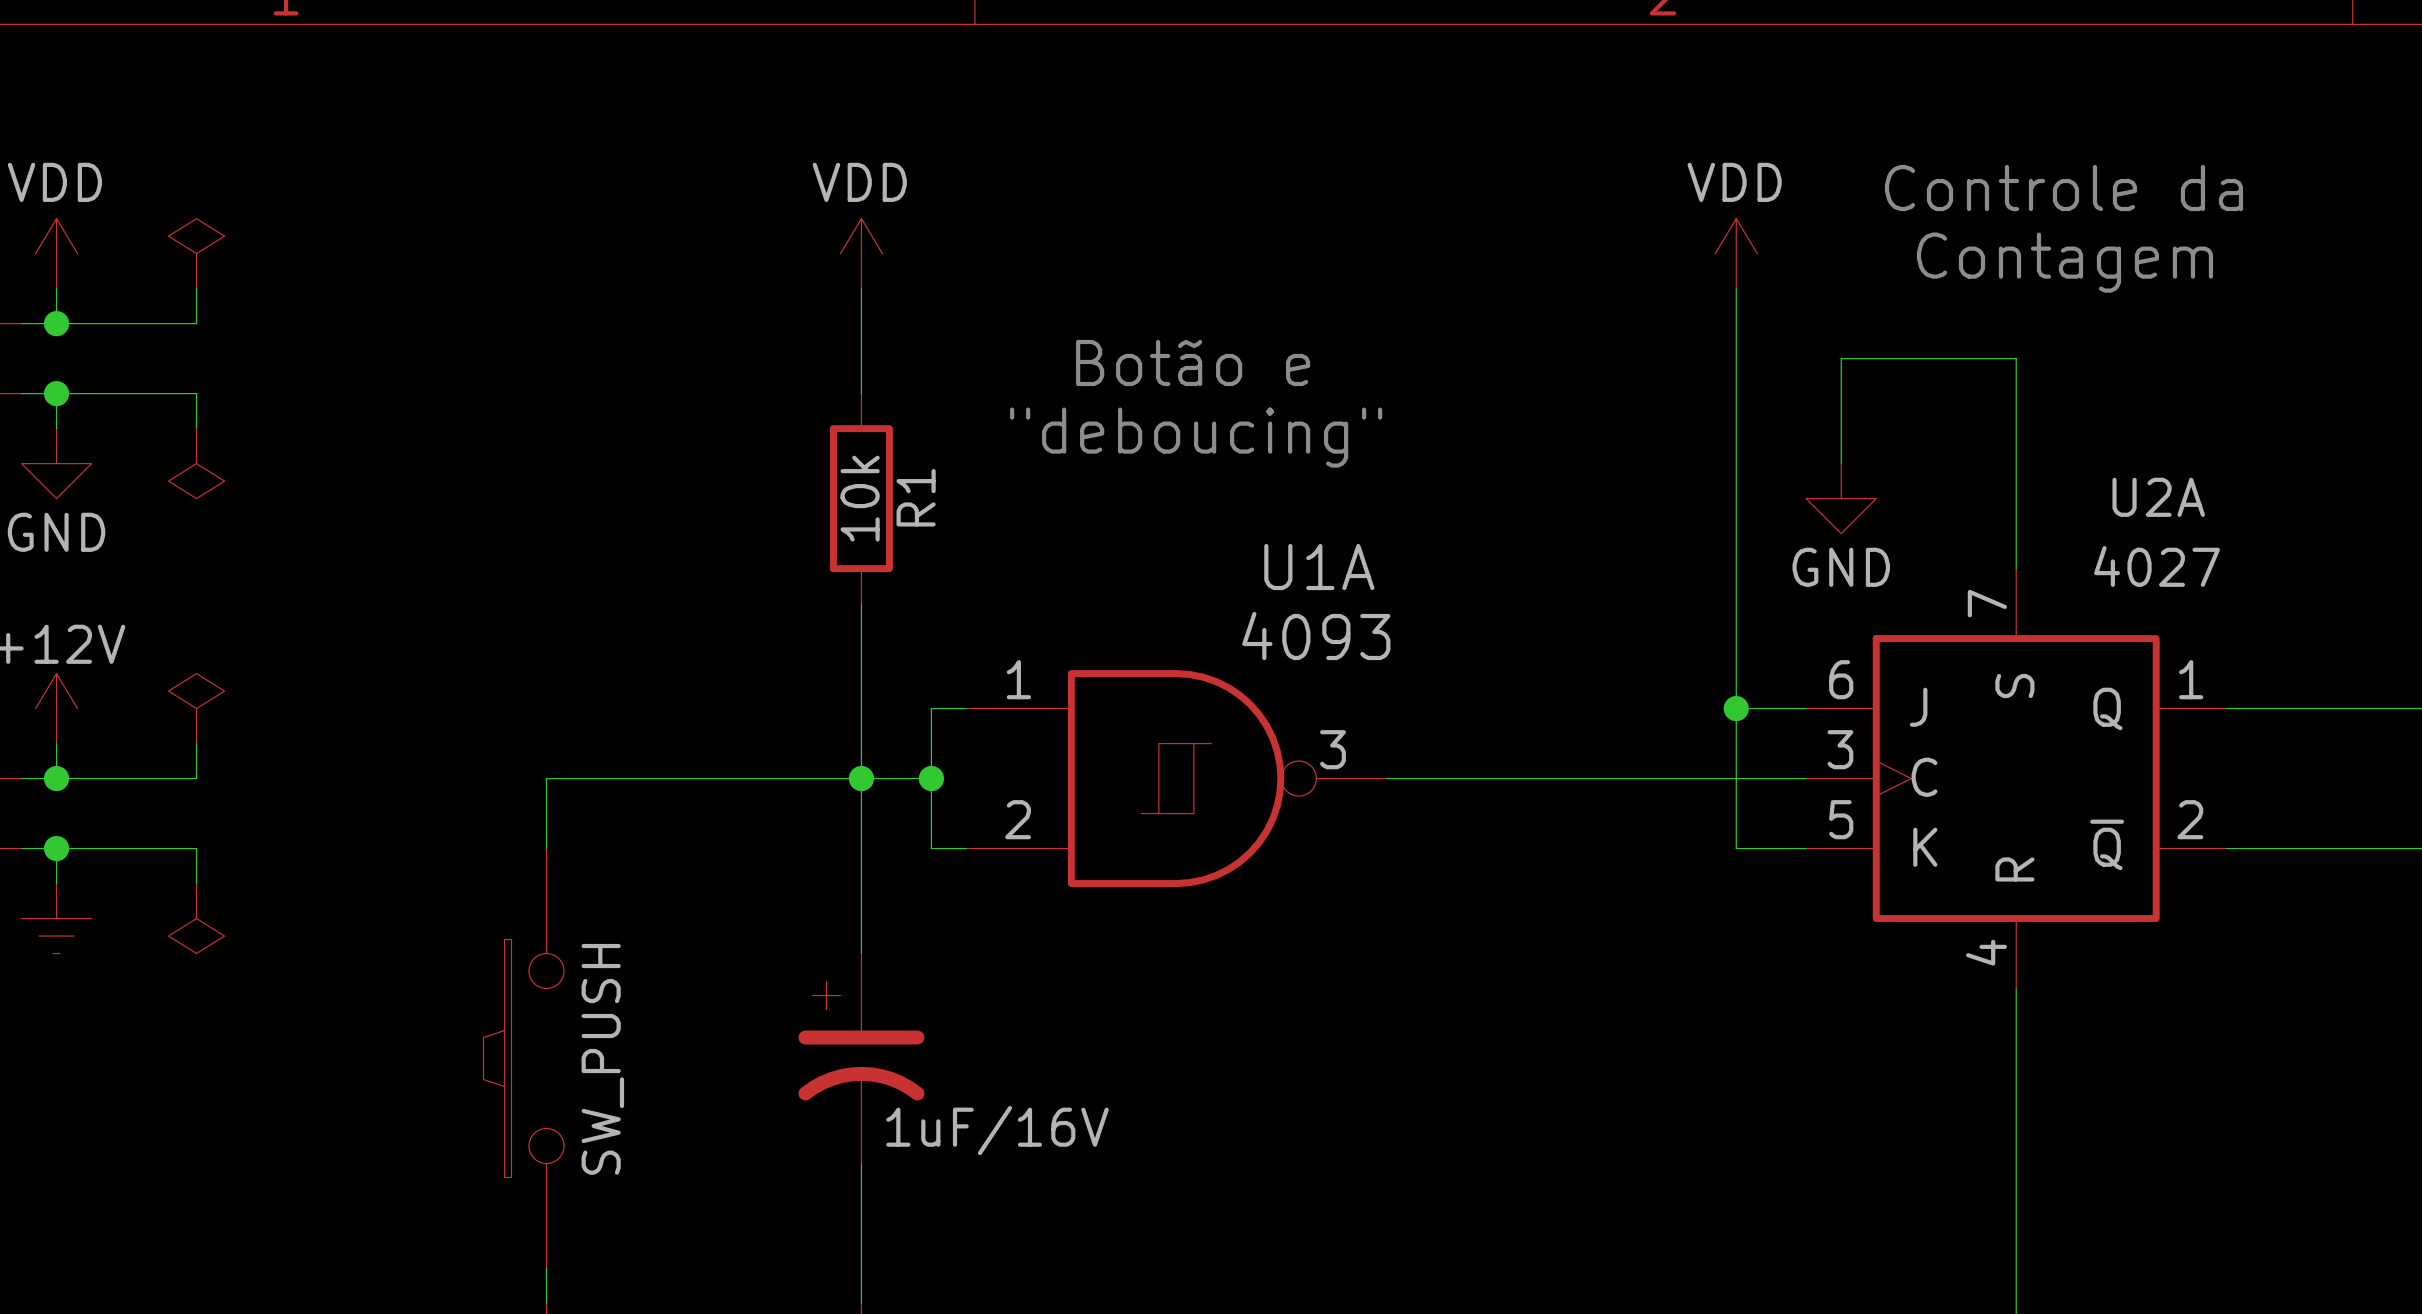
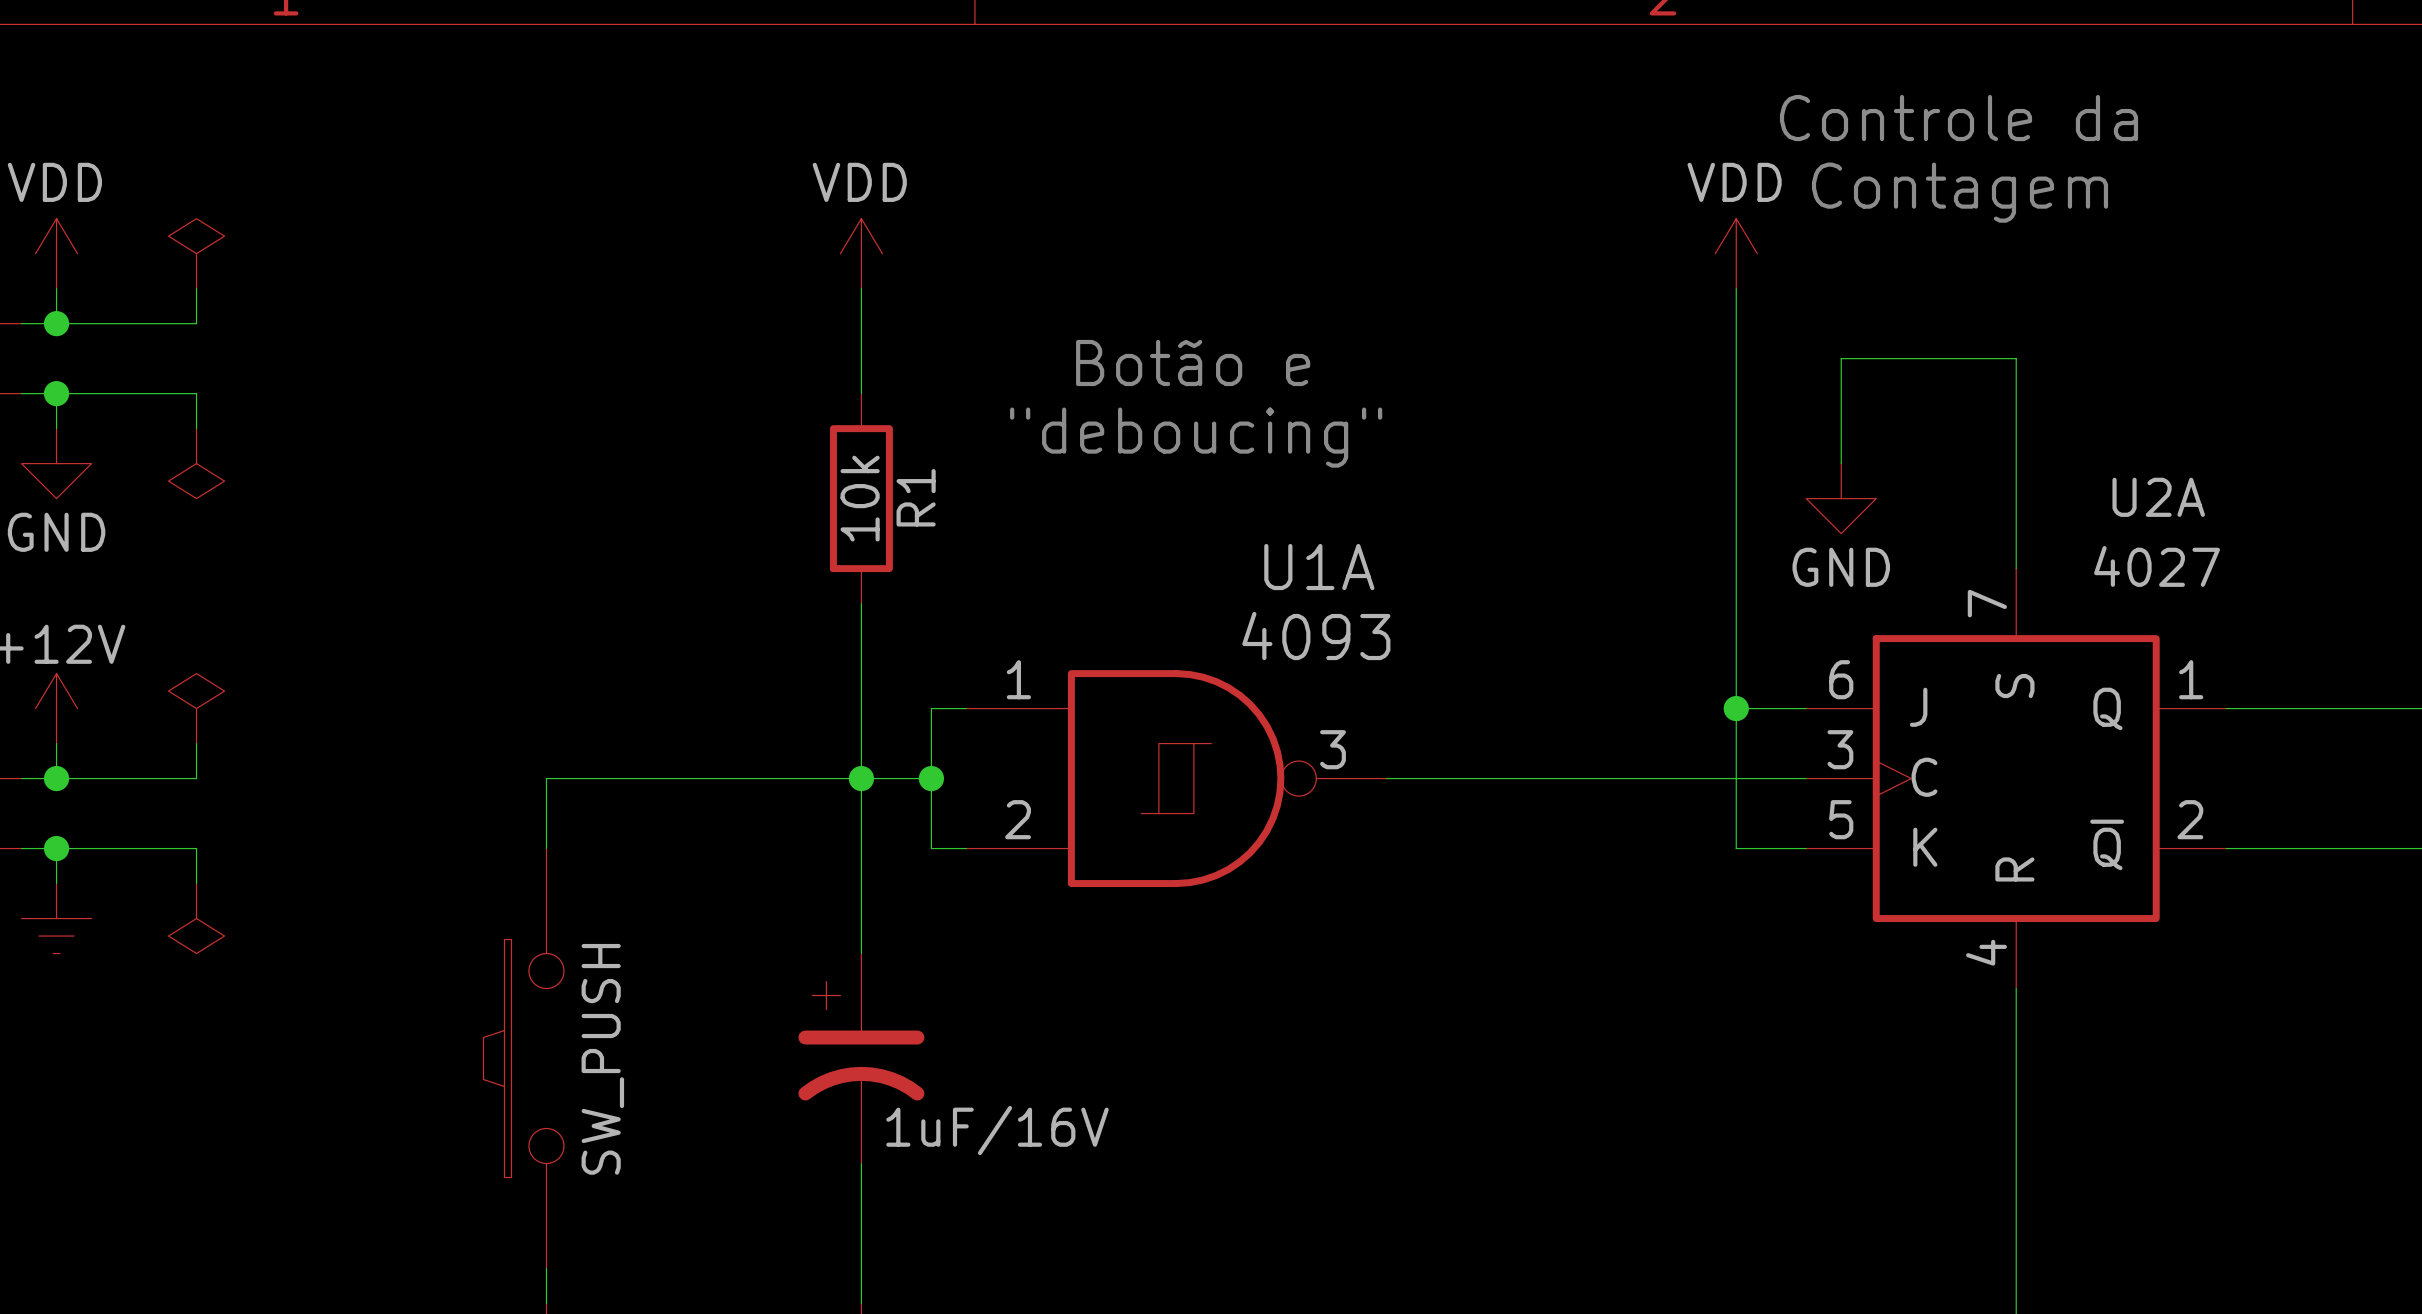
text position: Controle da (2063, 188) -> Controle da (1958, 118)
text position: Contagem (2064, 262) -> Contagem (1959, 192)

